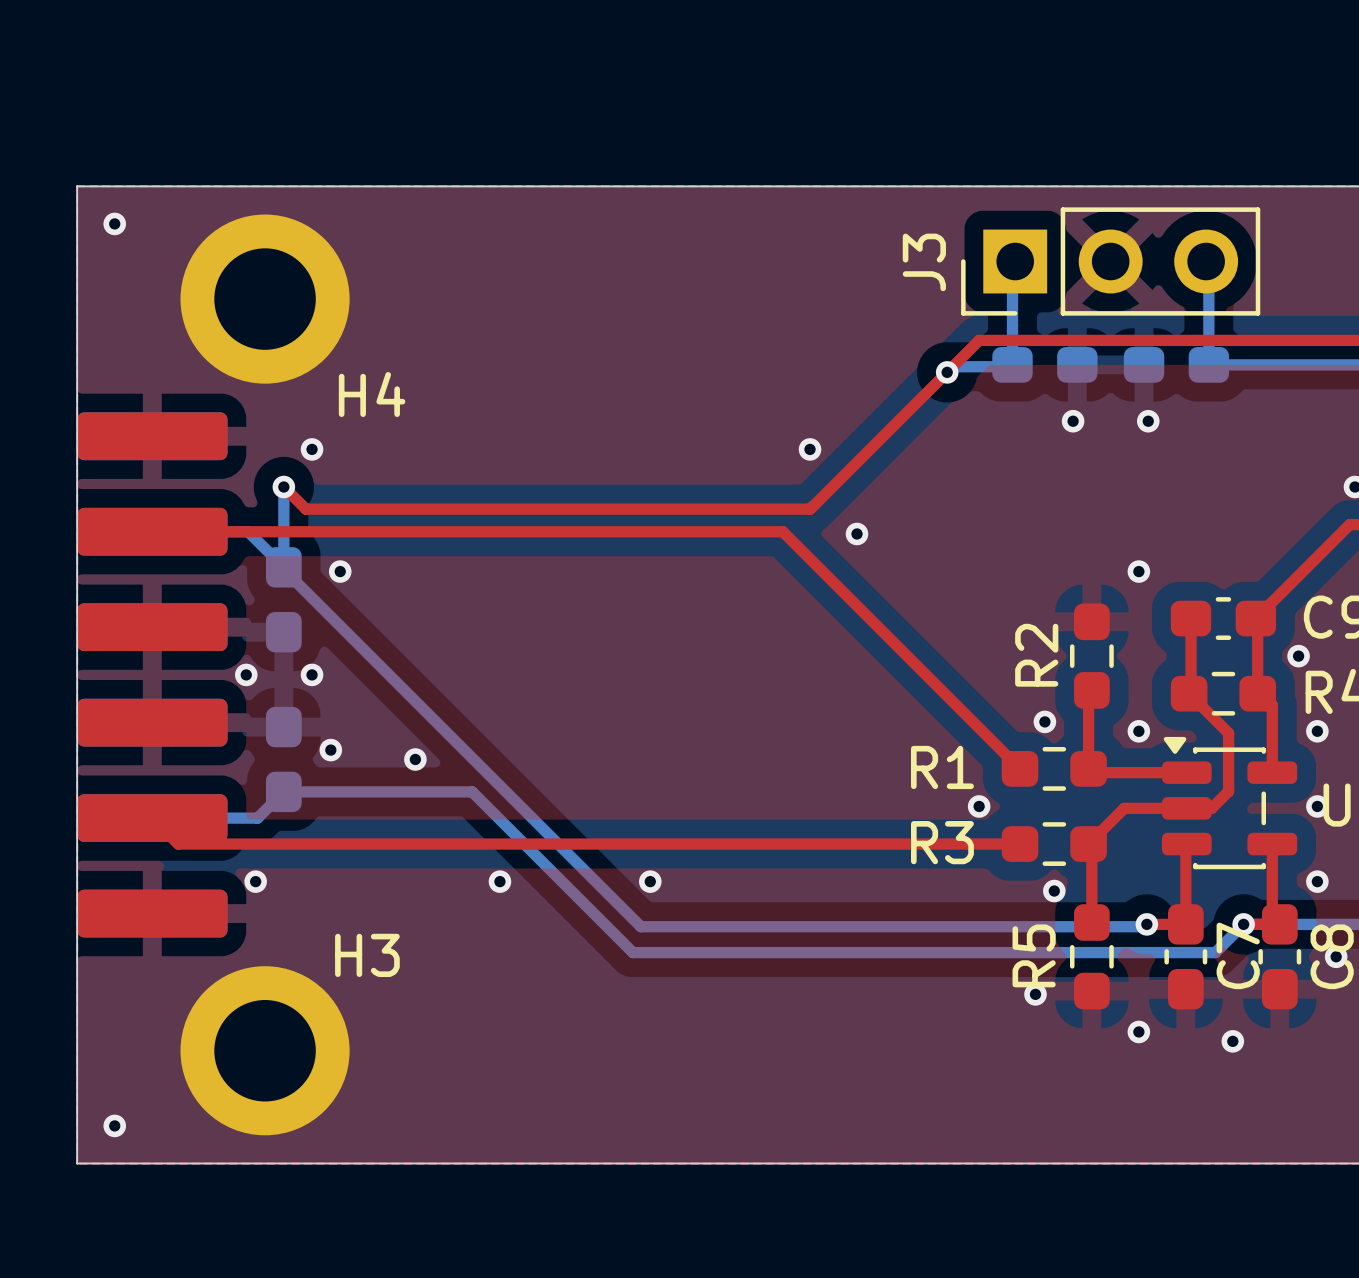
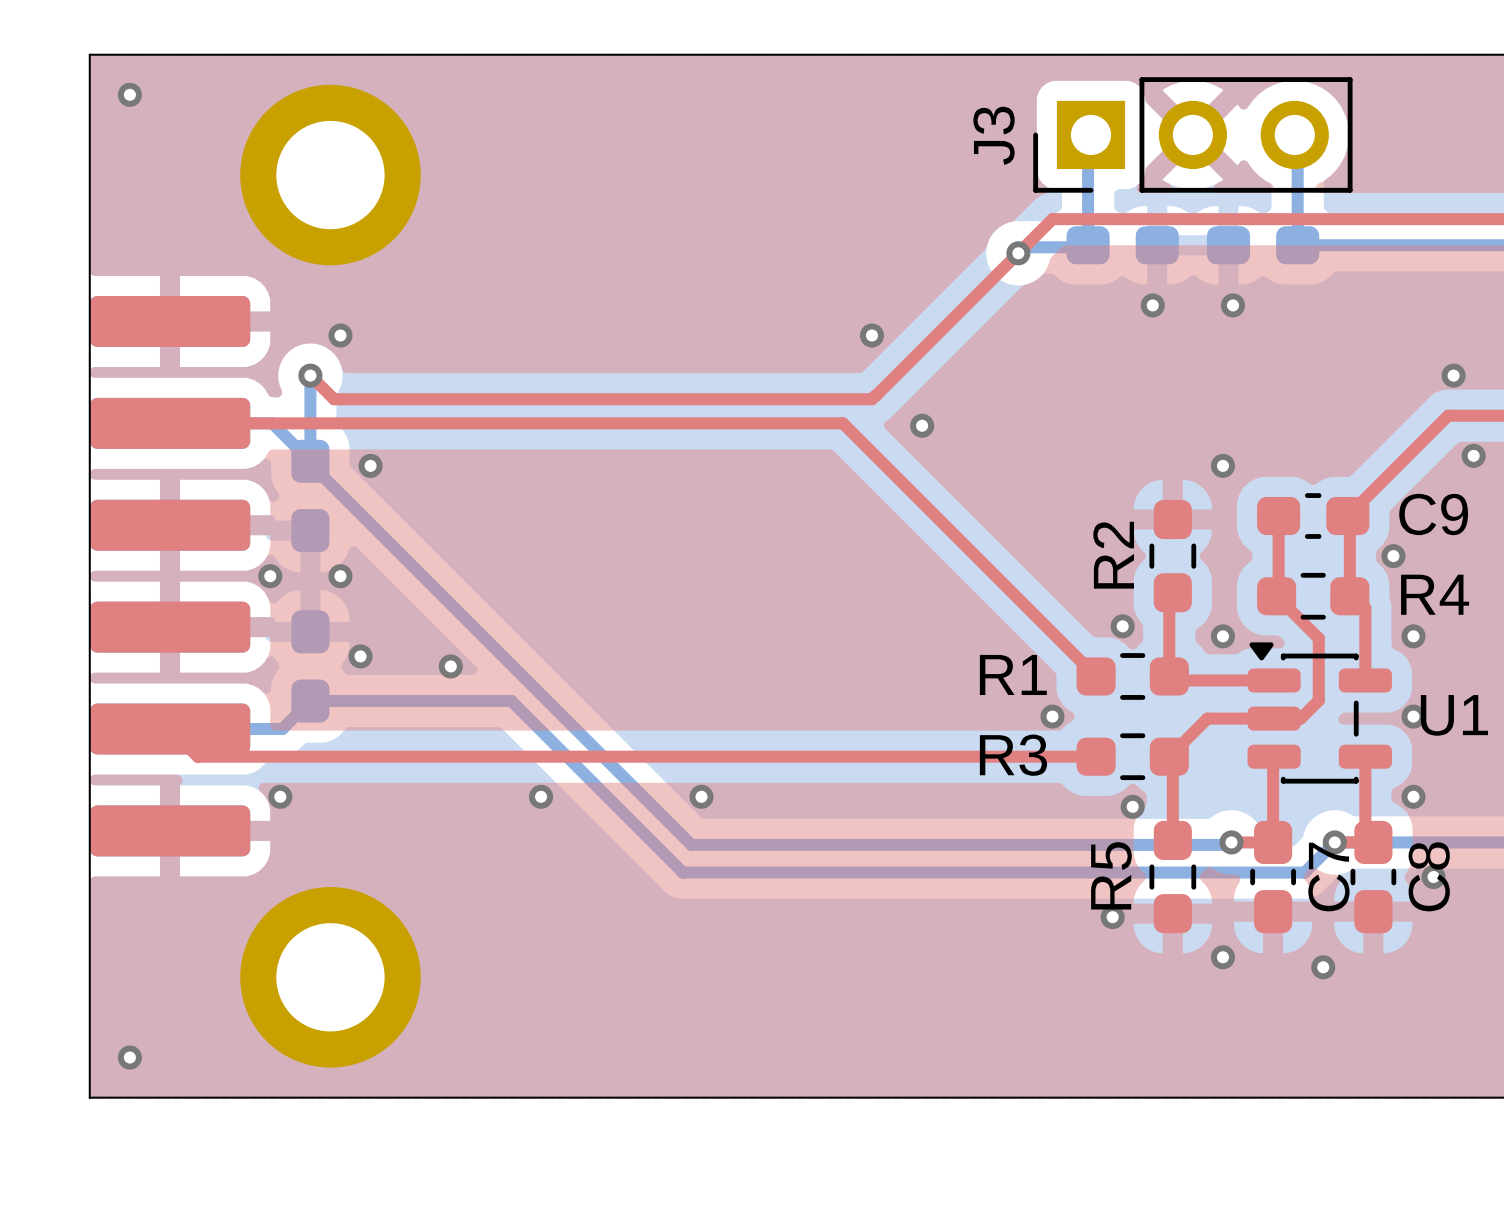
H4 position: (265, 299) -> (330, 175)
H4 name: H4 (372, 394) -> none
H3 name: H3 (367, 955) -> none
H3 position: (265, 1050) -> (330, 977)

